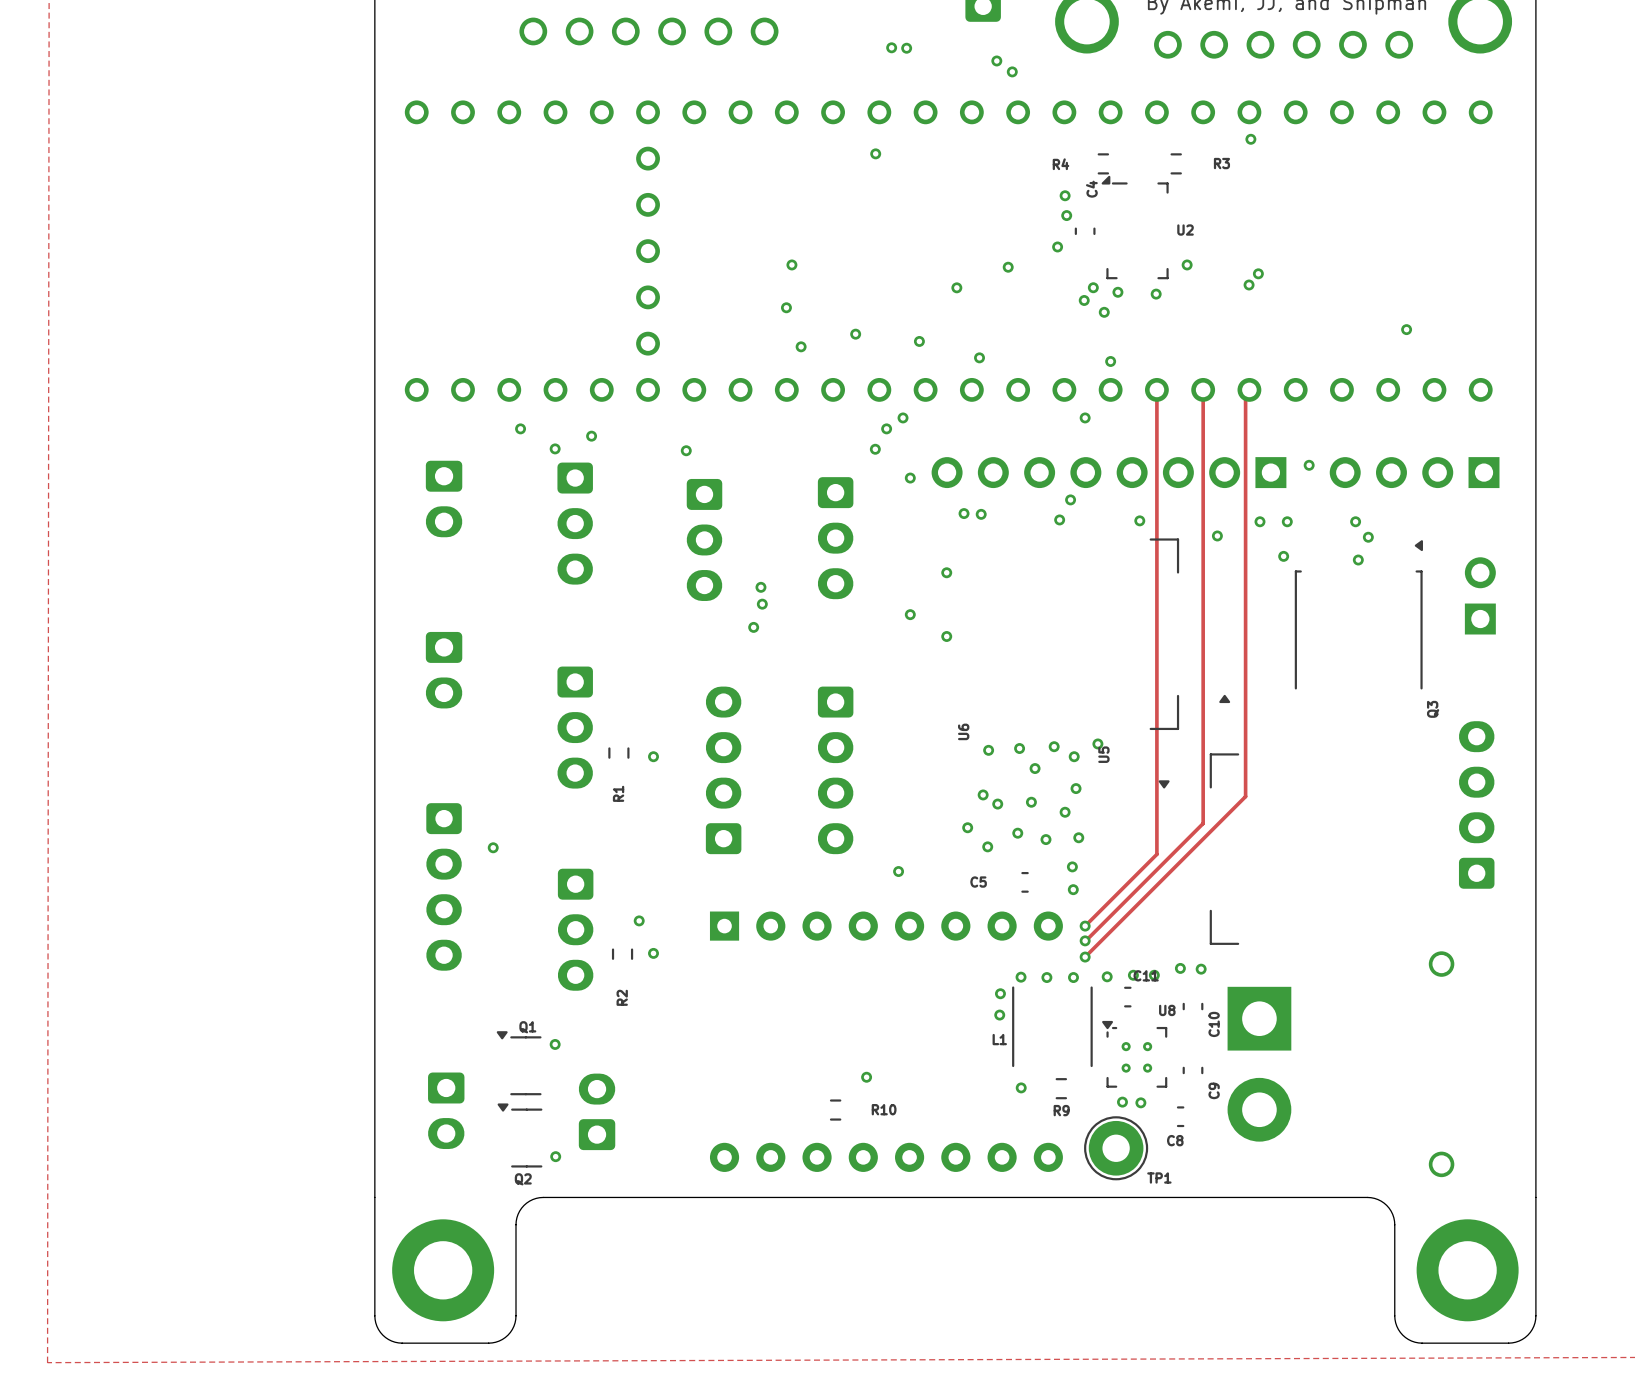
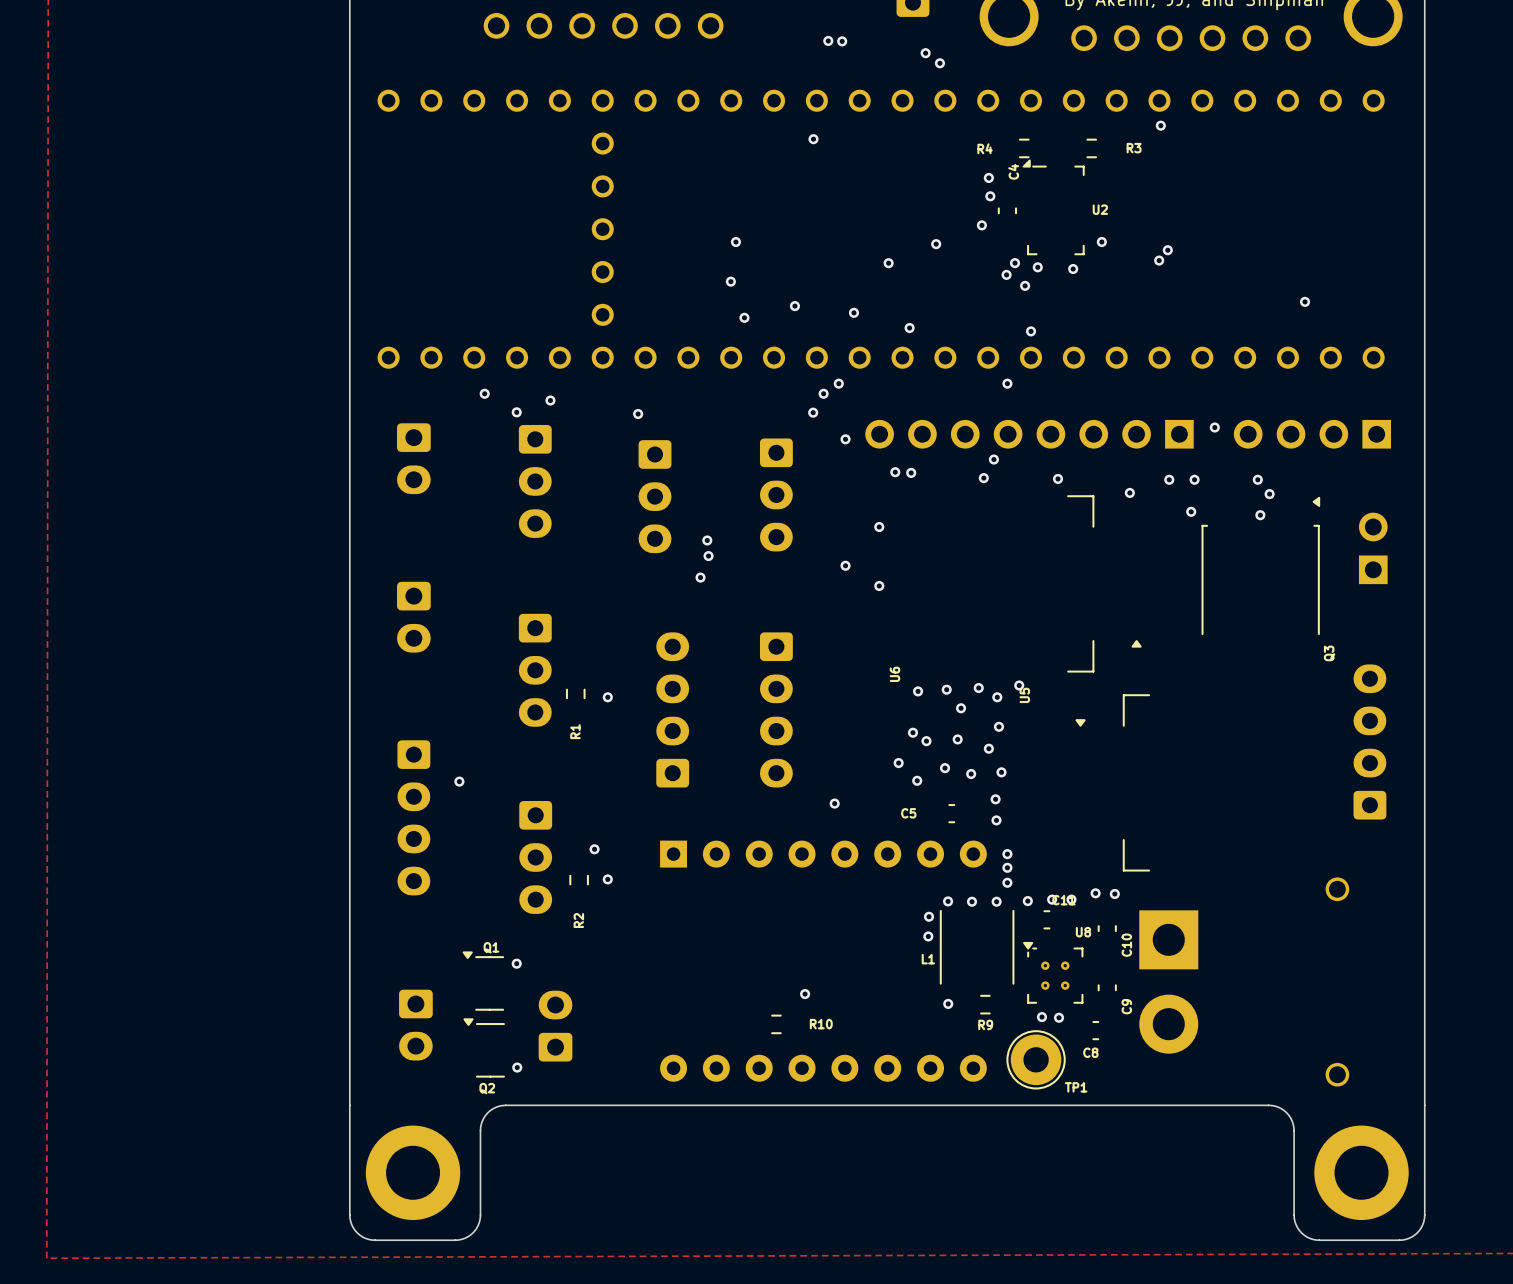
track: (1156, 389) (1156, 854) (1085, 926) -> none
track: (1203, 389) (1203, 823) (1085, 940) -> none
track: (1249, 389) (1245, 393) (1245, 796) (1085, 957) -> none

